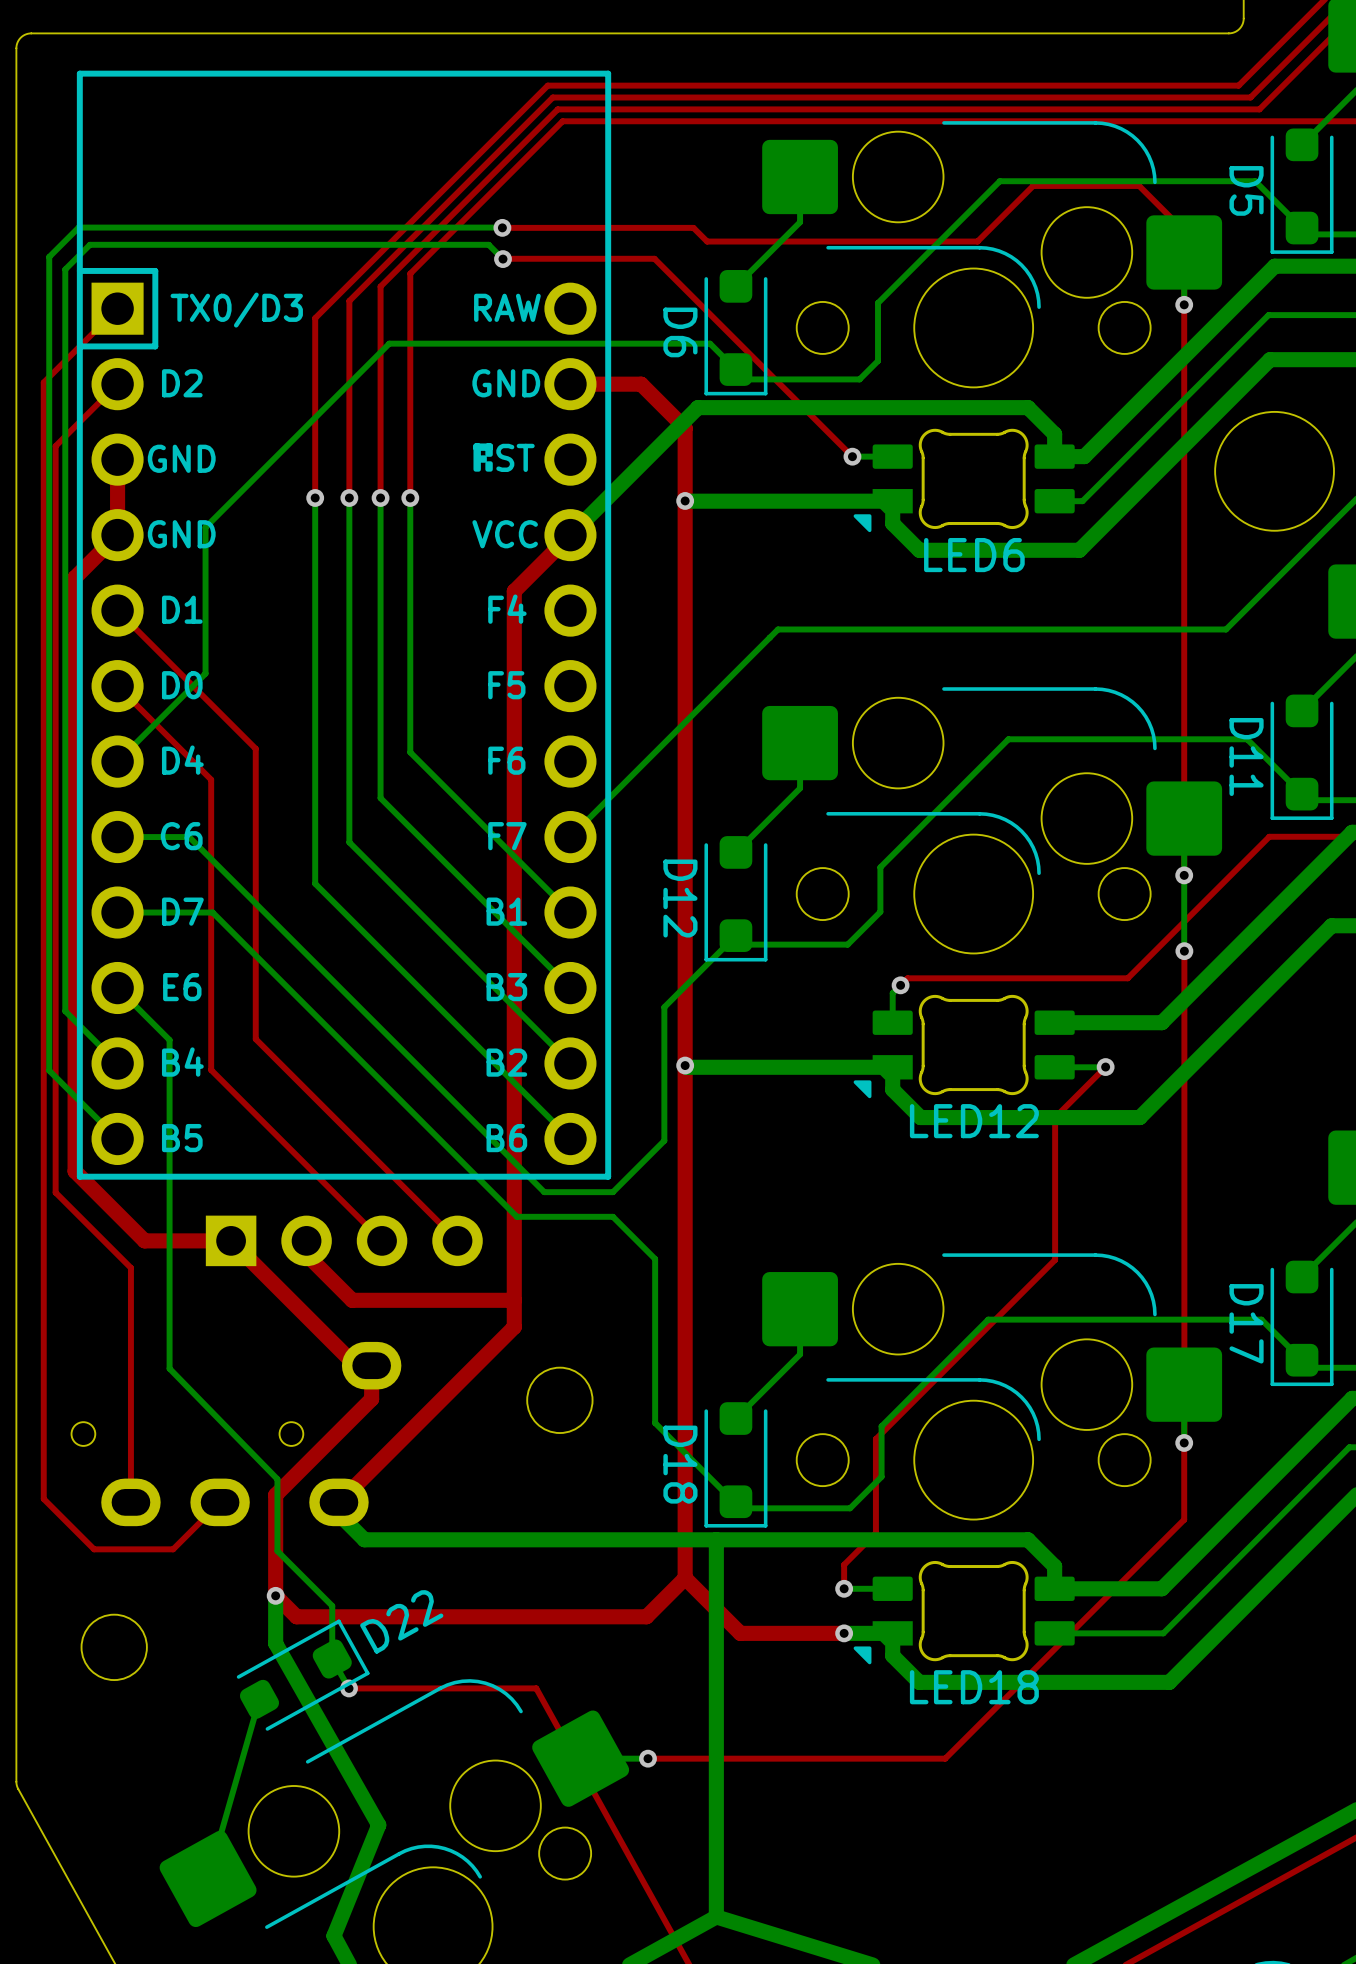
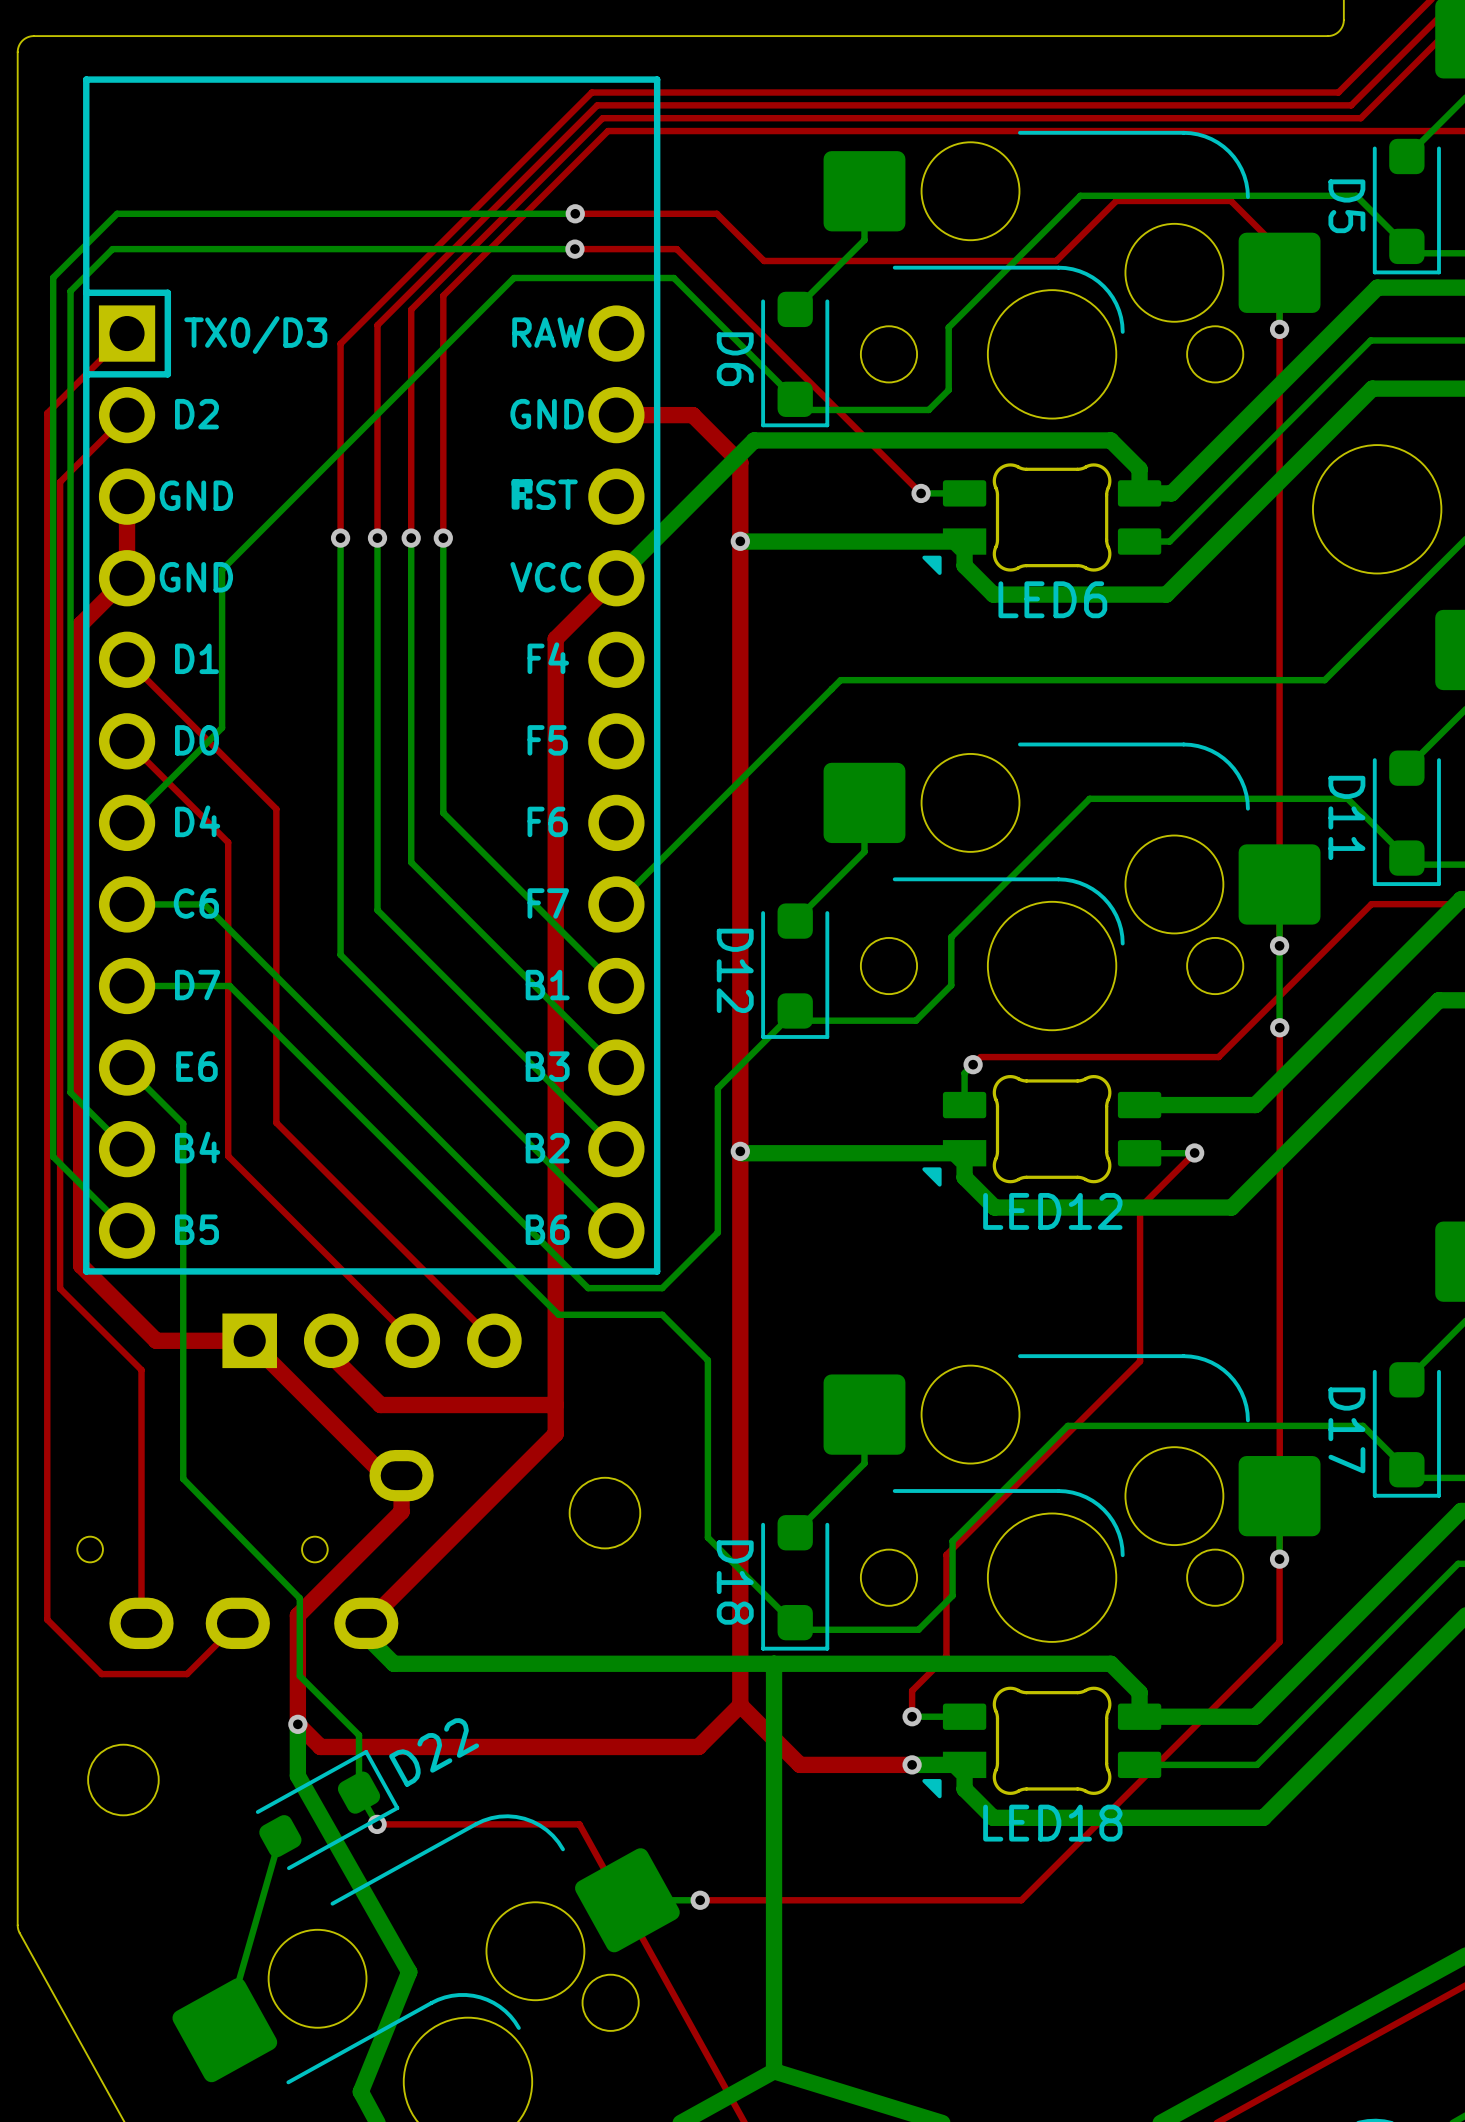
via: none -> (575, 213)
bottom track: (502, 227) (78, 227) -> (575, 213) (117, 213) (84, 245)
via: (502, 227) -> none
top track: (693, 227) (502, 227) -> (749, 246) (716, 213) (575, 213)
via: none -> (574, 249)
bottom track: (89, 244) (488, 244) (503, 259) -> (97, 264) (112, 249) (574, 249)
top track: (654, 258) (503, 258) -> (707, 279) (676, 249) (574, 249)
via: (503, 259) -> none
bottom track: (710, 343) (389, 343) -> (767, 371) (673, 278) (513, 278) (420, 371)

